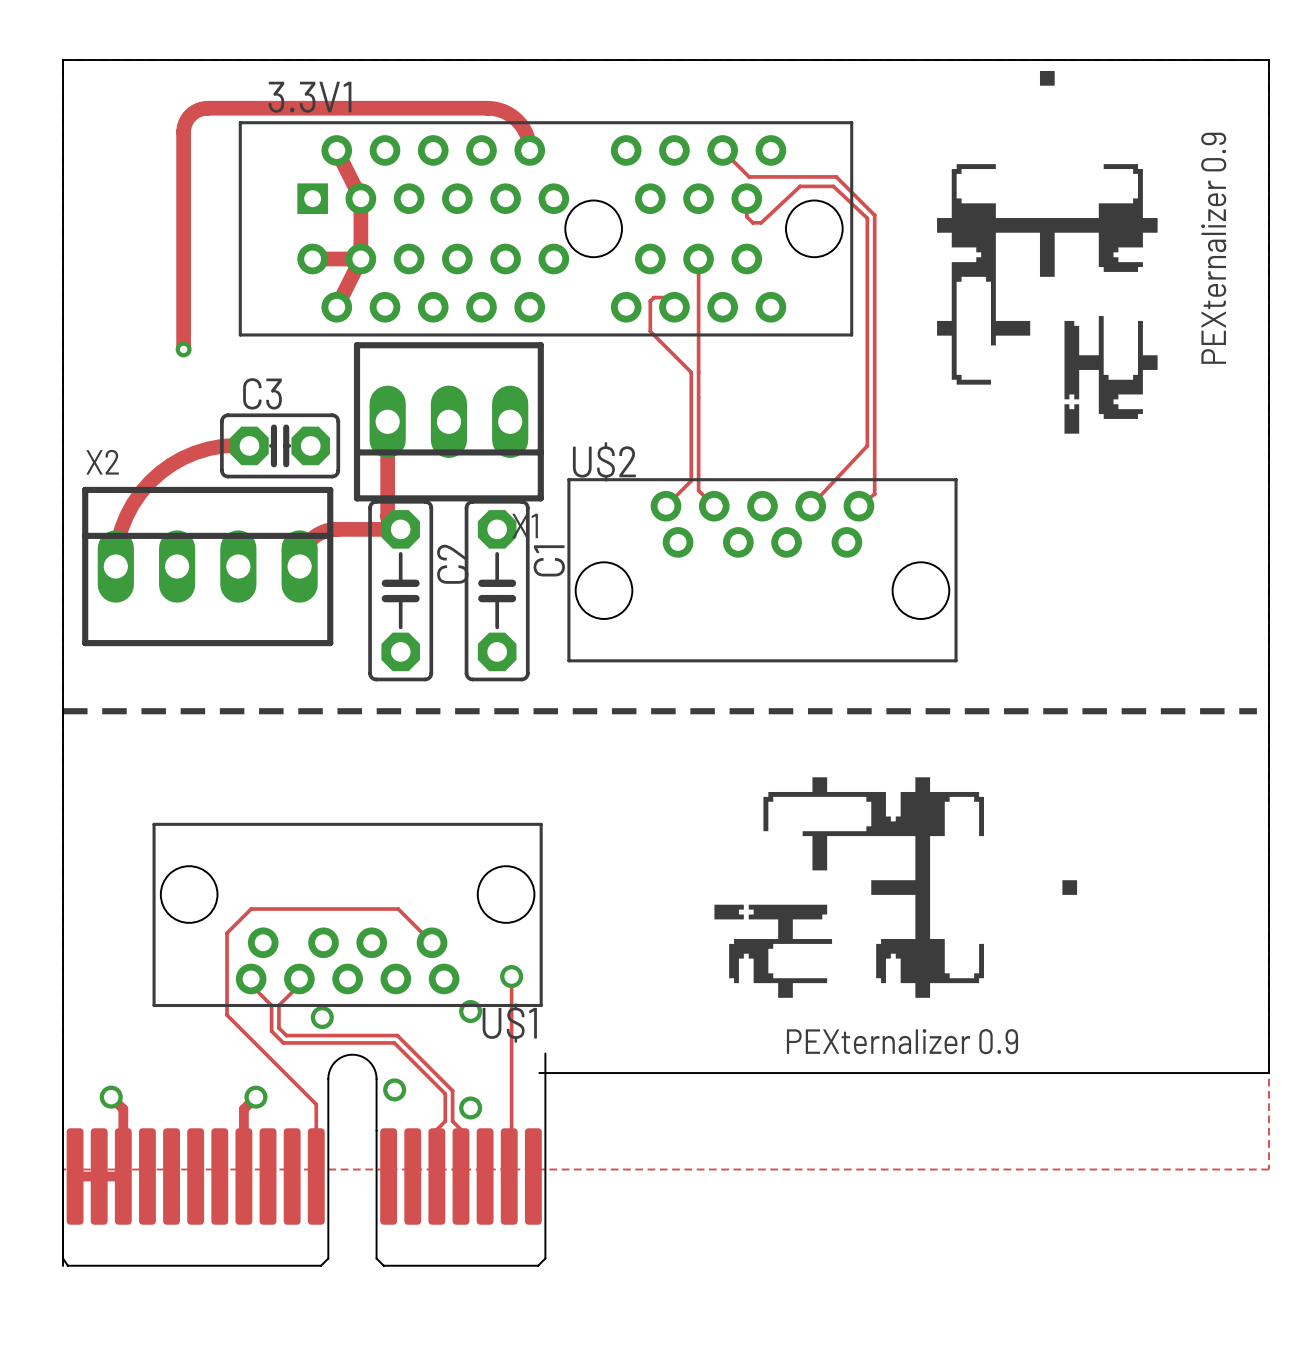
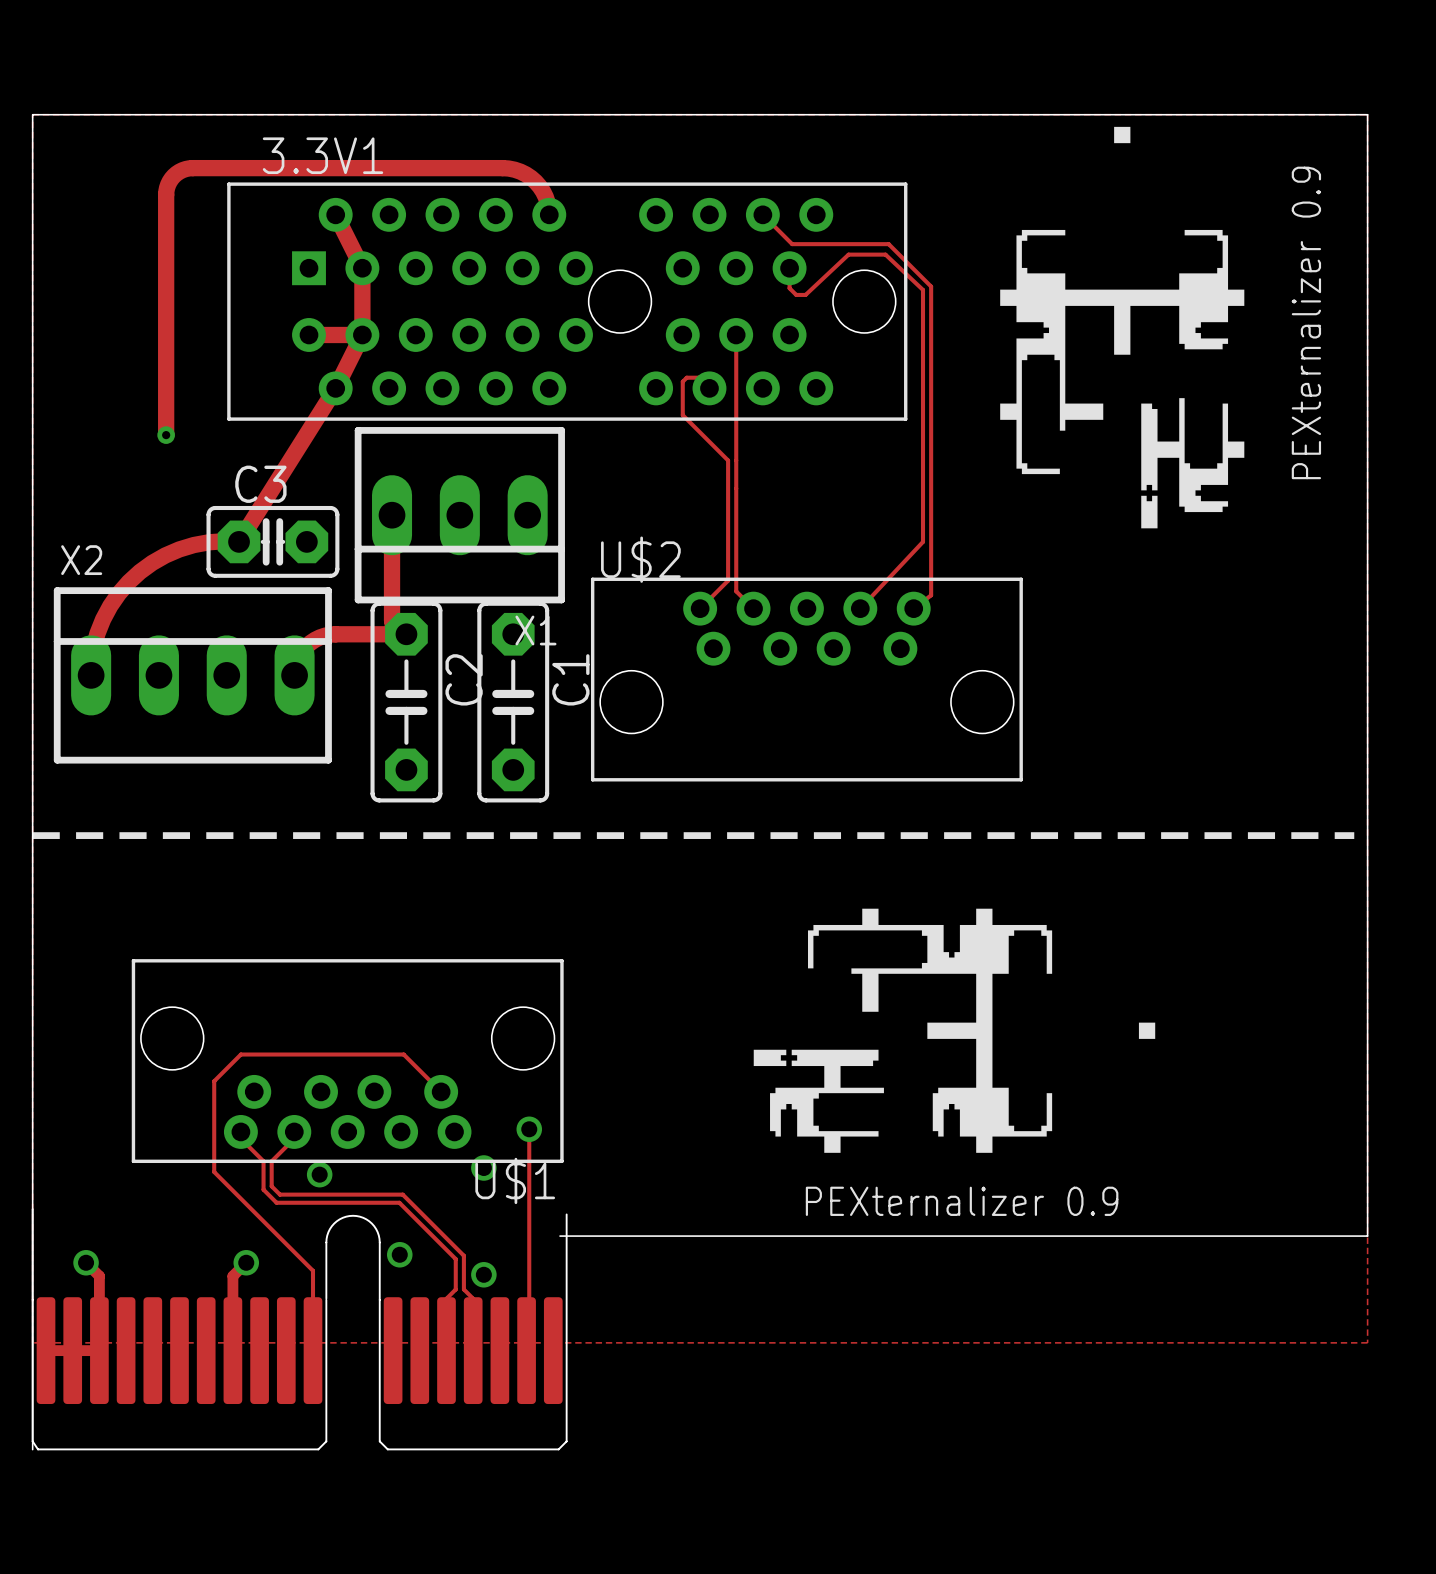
track: none -> (335, 388) (239, 541)

